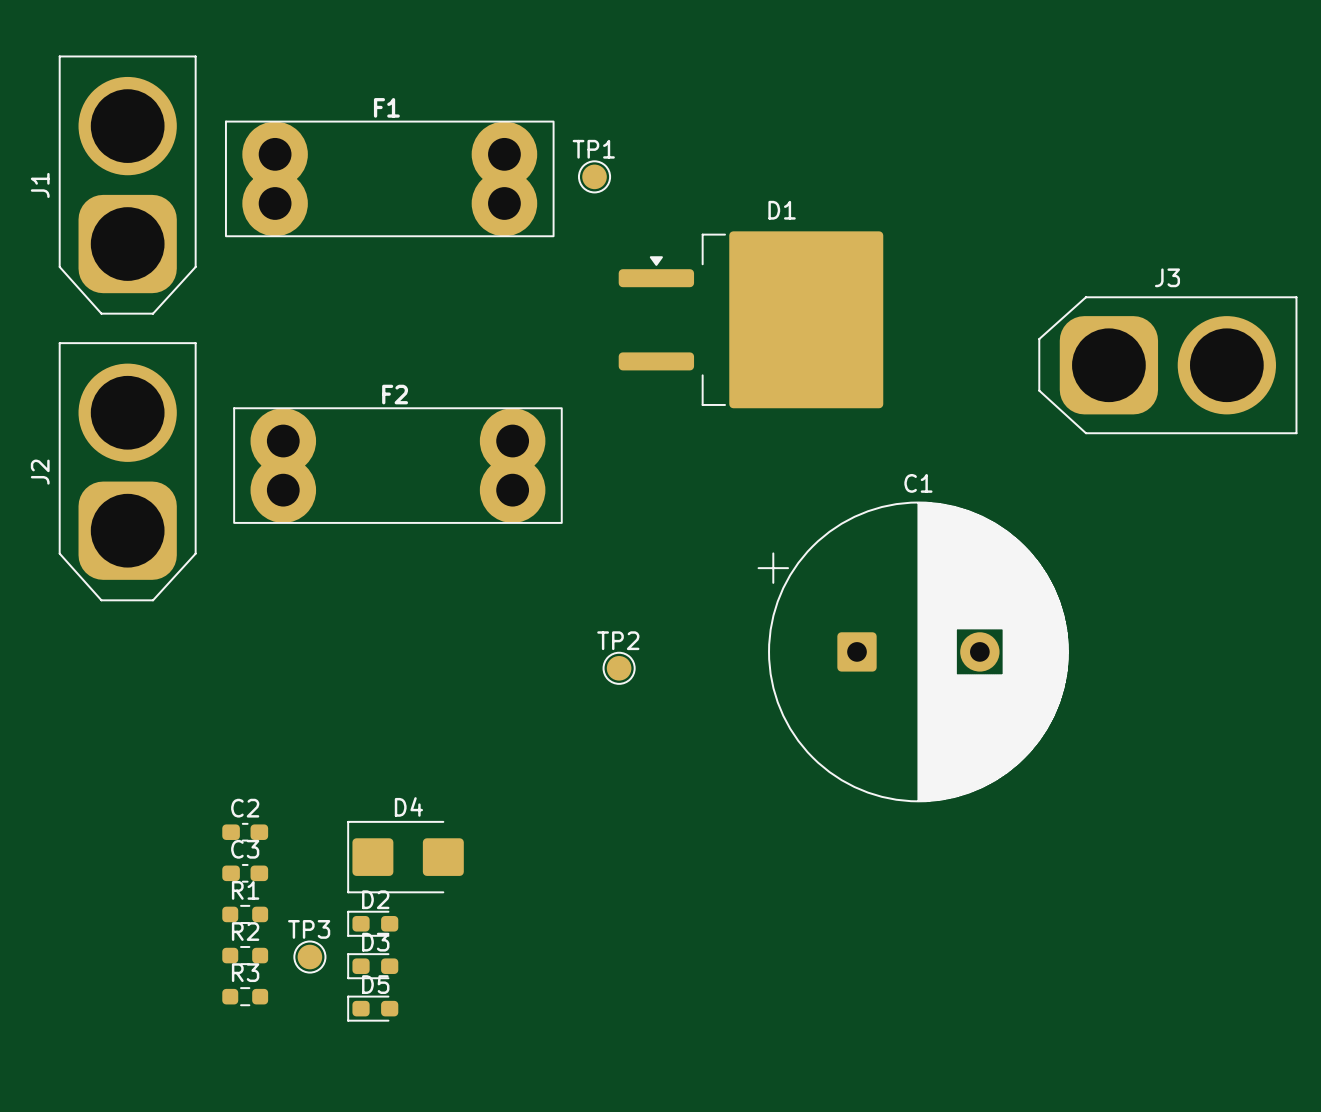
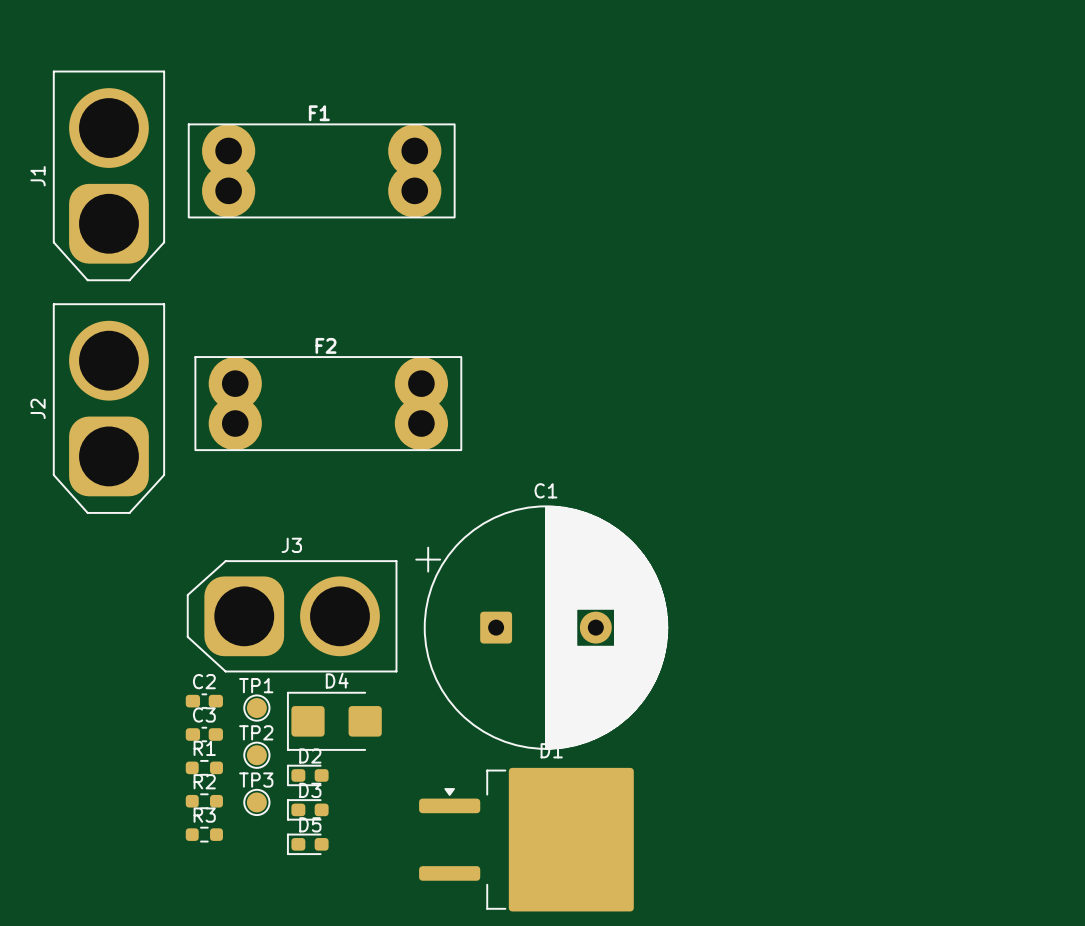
TP1 position: (594, 176) -> (256, 708)
D1 position: (750, 319) -> (526, 839)
J3 position: (1167, 365) -> (292, 616)
C1 position: (913, 651) -> (541, 627)
TP2 position: (619, 668) -> (256, 755)

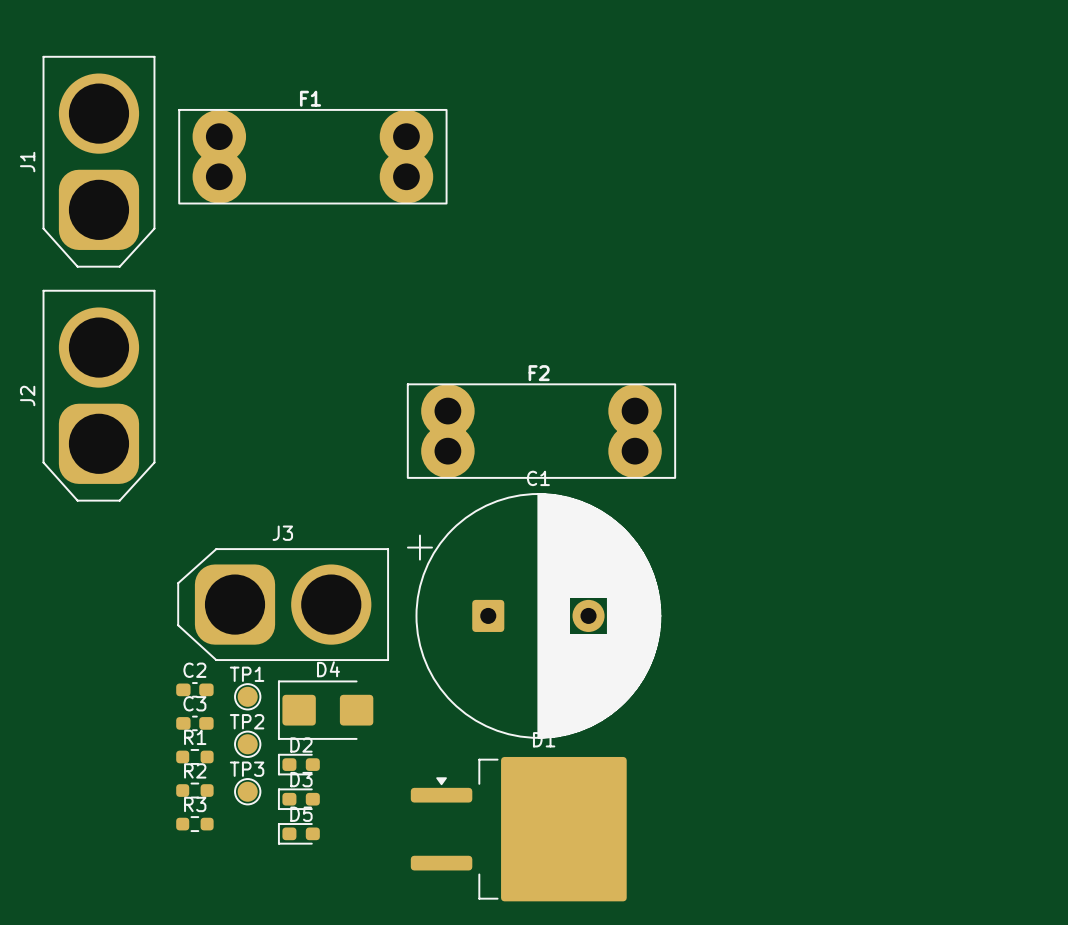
F2 position: (328, 403) -> (541, 431)

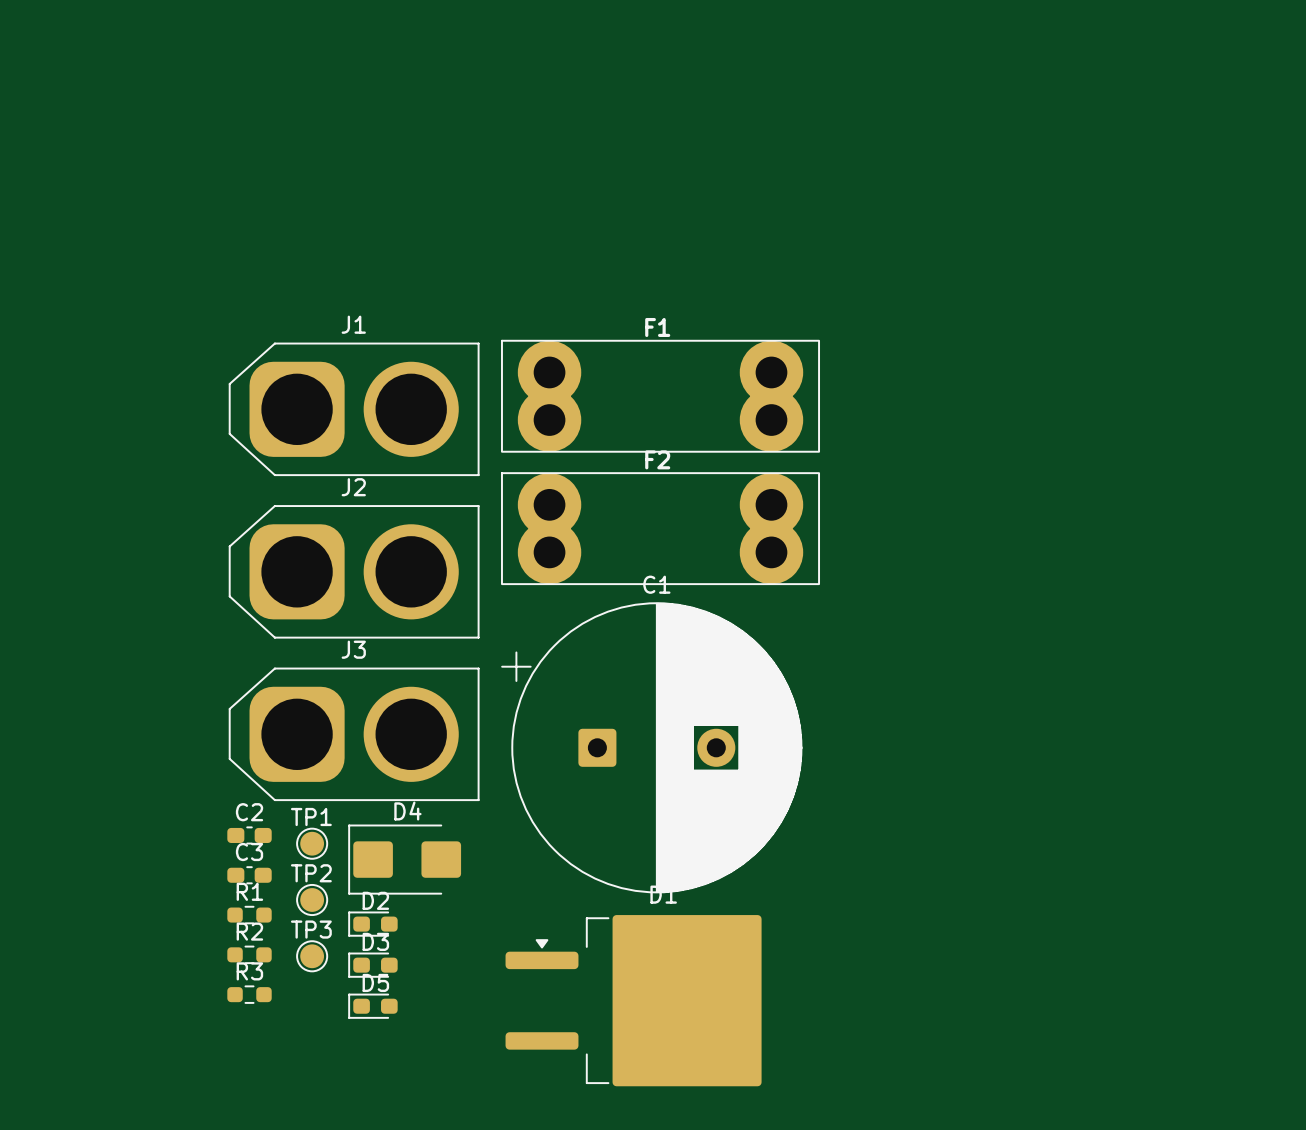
F1 position: (312, 156) -> (660, 396)
J1 rotation: 0° (98, 161) -> 90° clockwise (354, 409)
J1 position: (98, 161) -> (354, 409)
J2 rotation: 0° (98, 395) -> 90° clockwise (354, 571)
J2 position: (98, 395) -> (354, 571)

